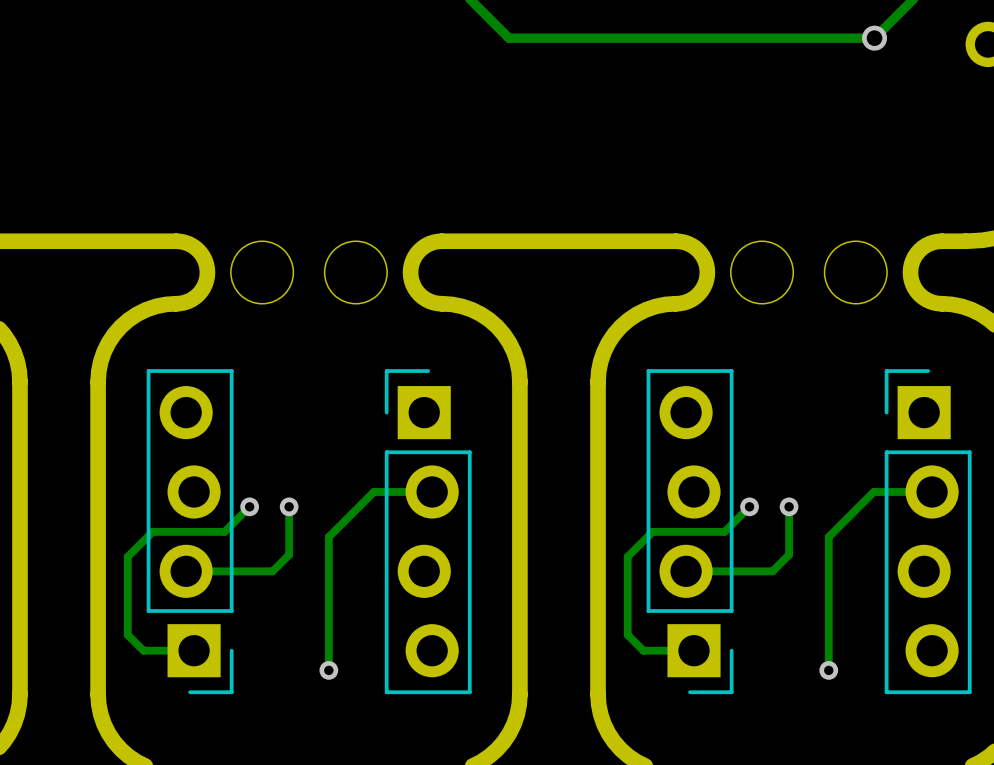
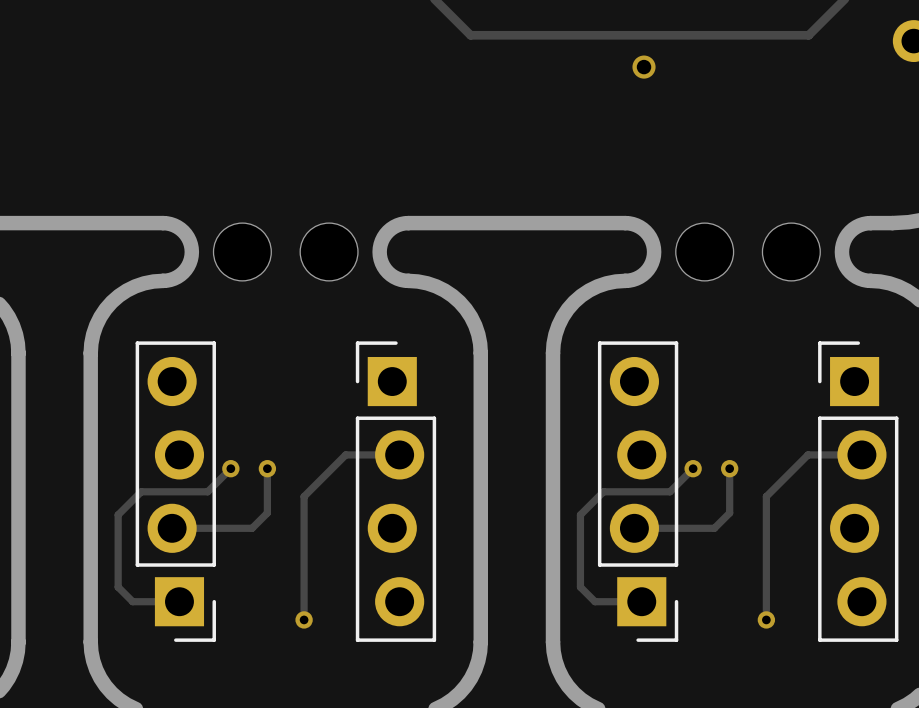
via position: (874, 38) -> (644, 67)

